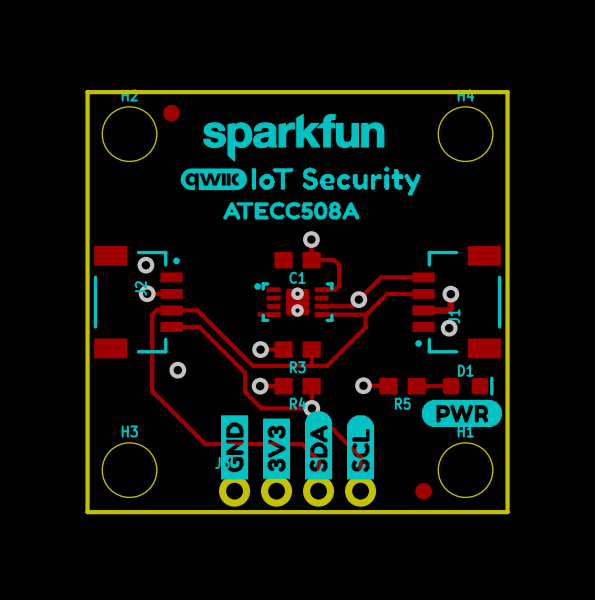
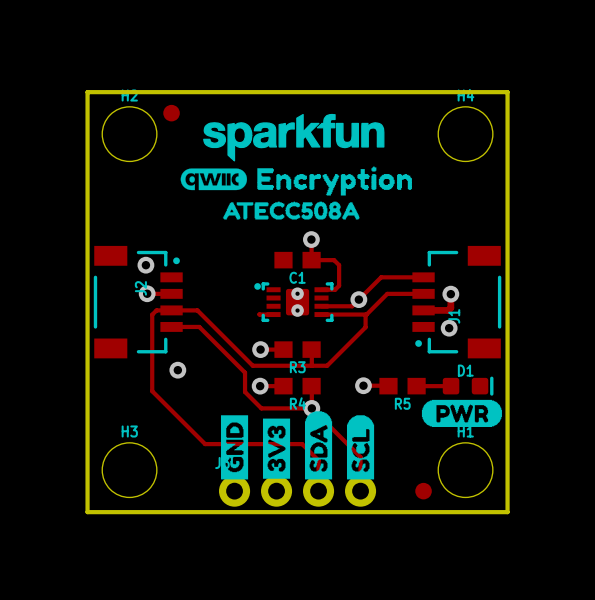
drawing shape: [251, 166, 421, 196] -> [257, 166, 412, 196]

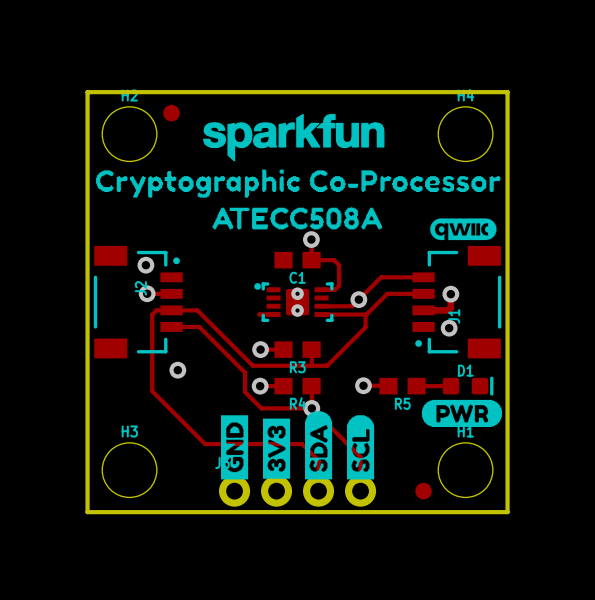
drawing: [257, 166, 412, 196] -> none
drawing: none -> [96, 169, 501, 198]
drawing position: (213, 179) -> (463, 229)
drawing shape: [222, 201, 360, 220] -> [212, 206, 382, 230]

